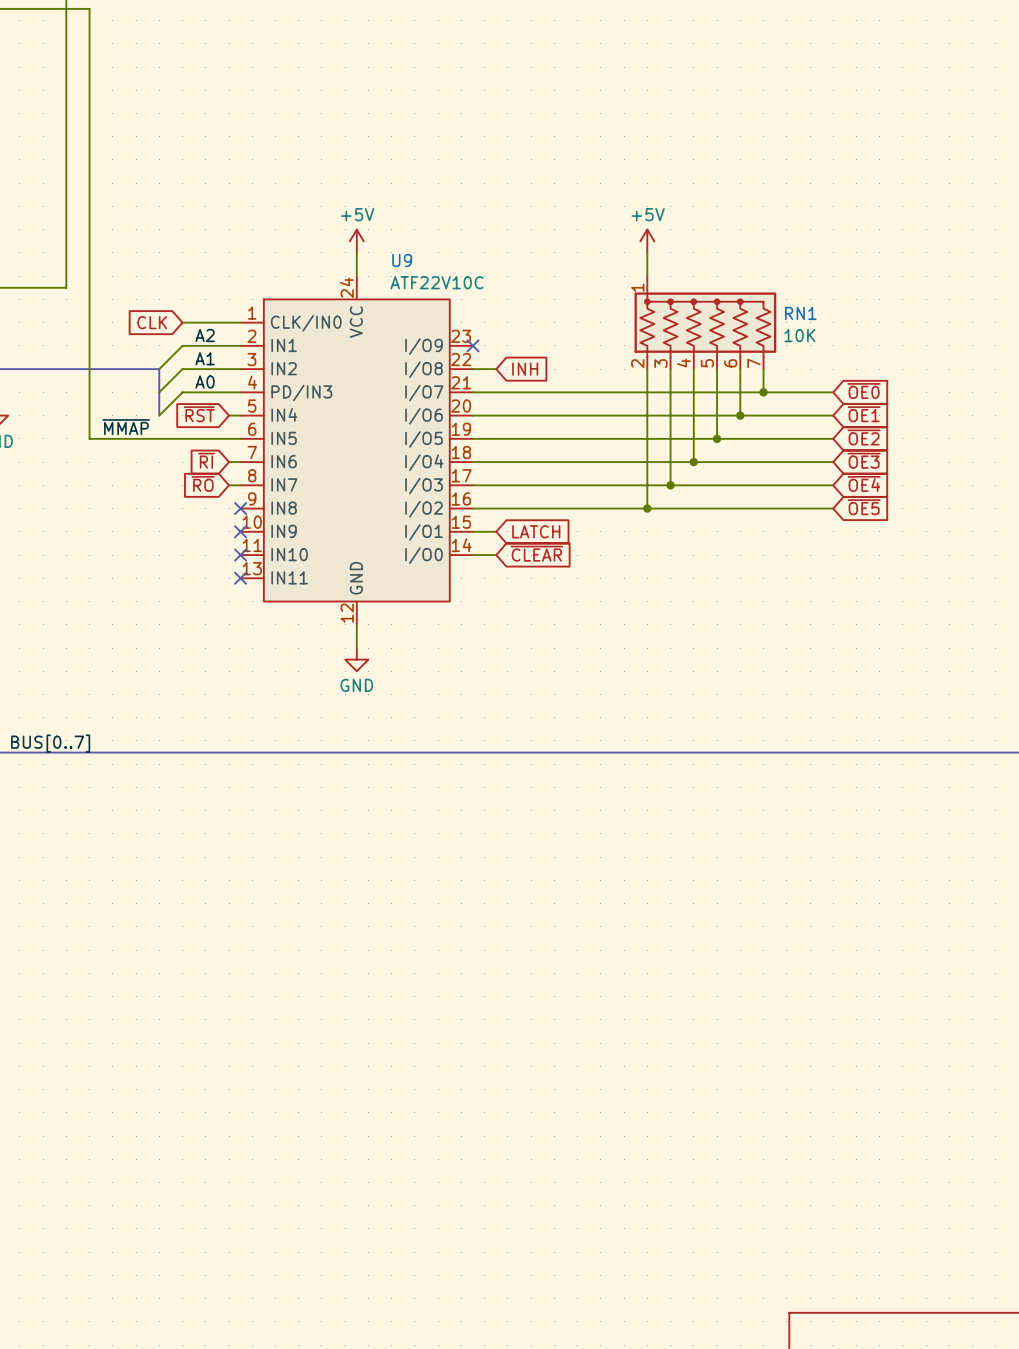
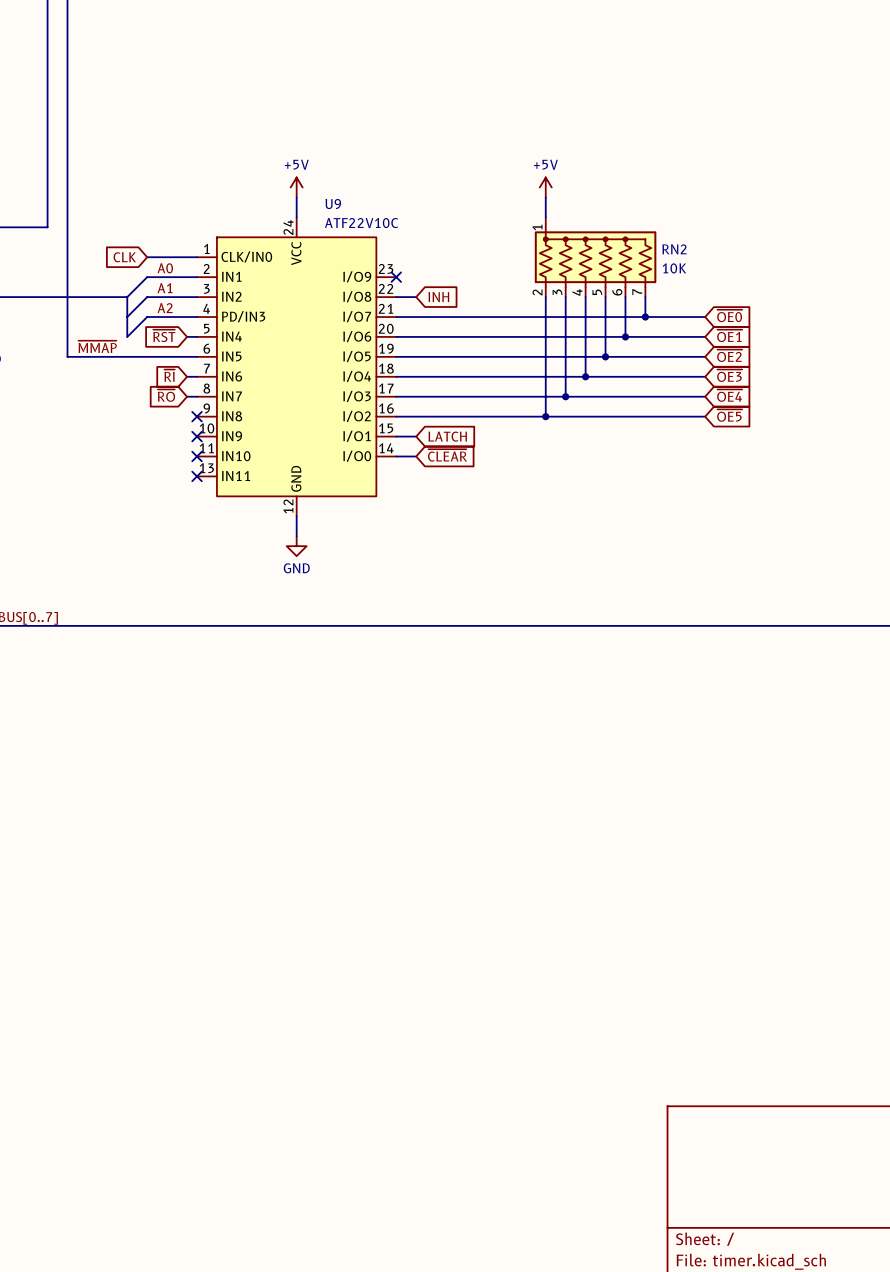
RN1 name: RN1 (800, 313) -> RN2 (674, 249)
label: A2 (205, 335) -> A0 (165, 268)
label: A0 (205, 381) -> A2 (165, 308)

